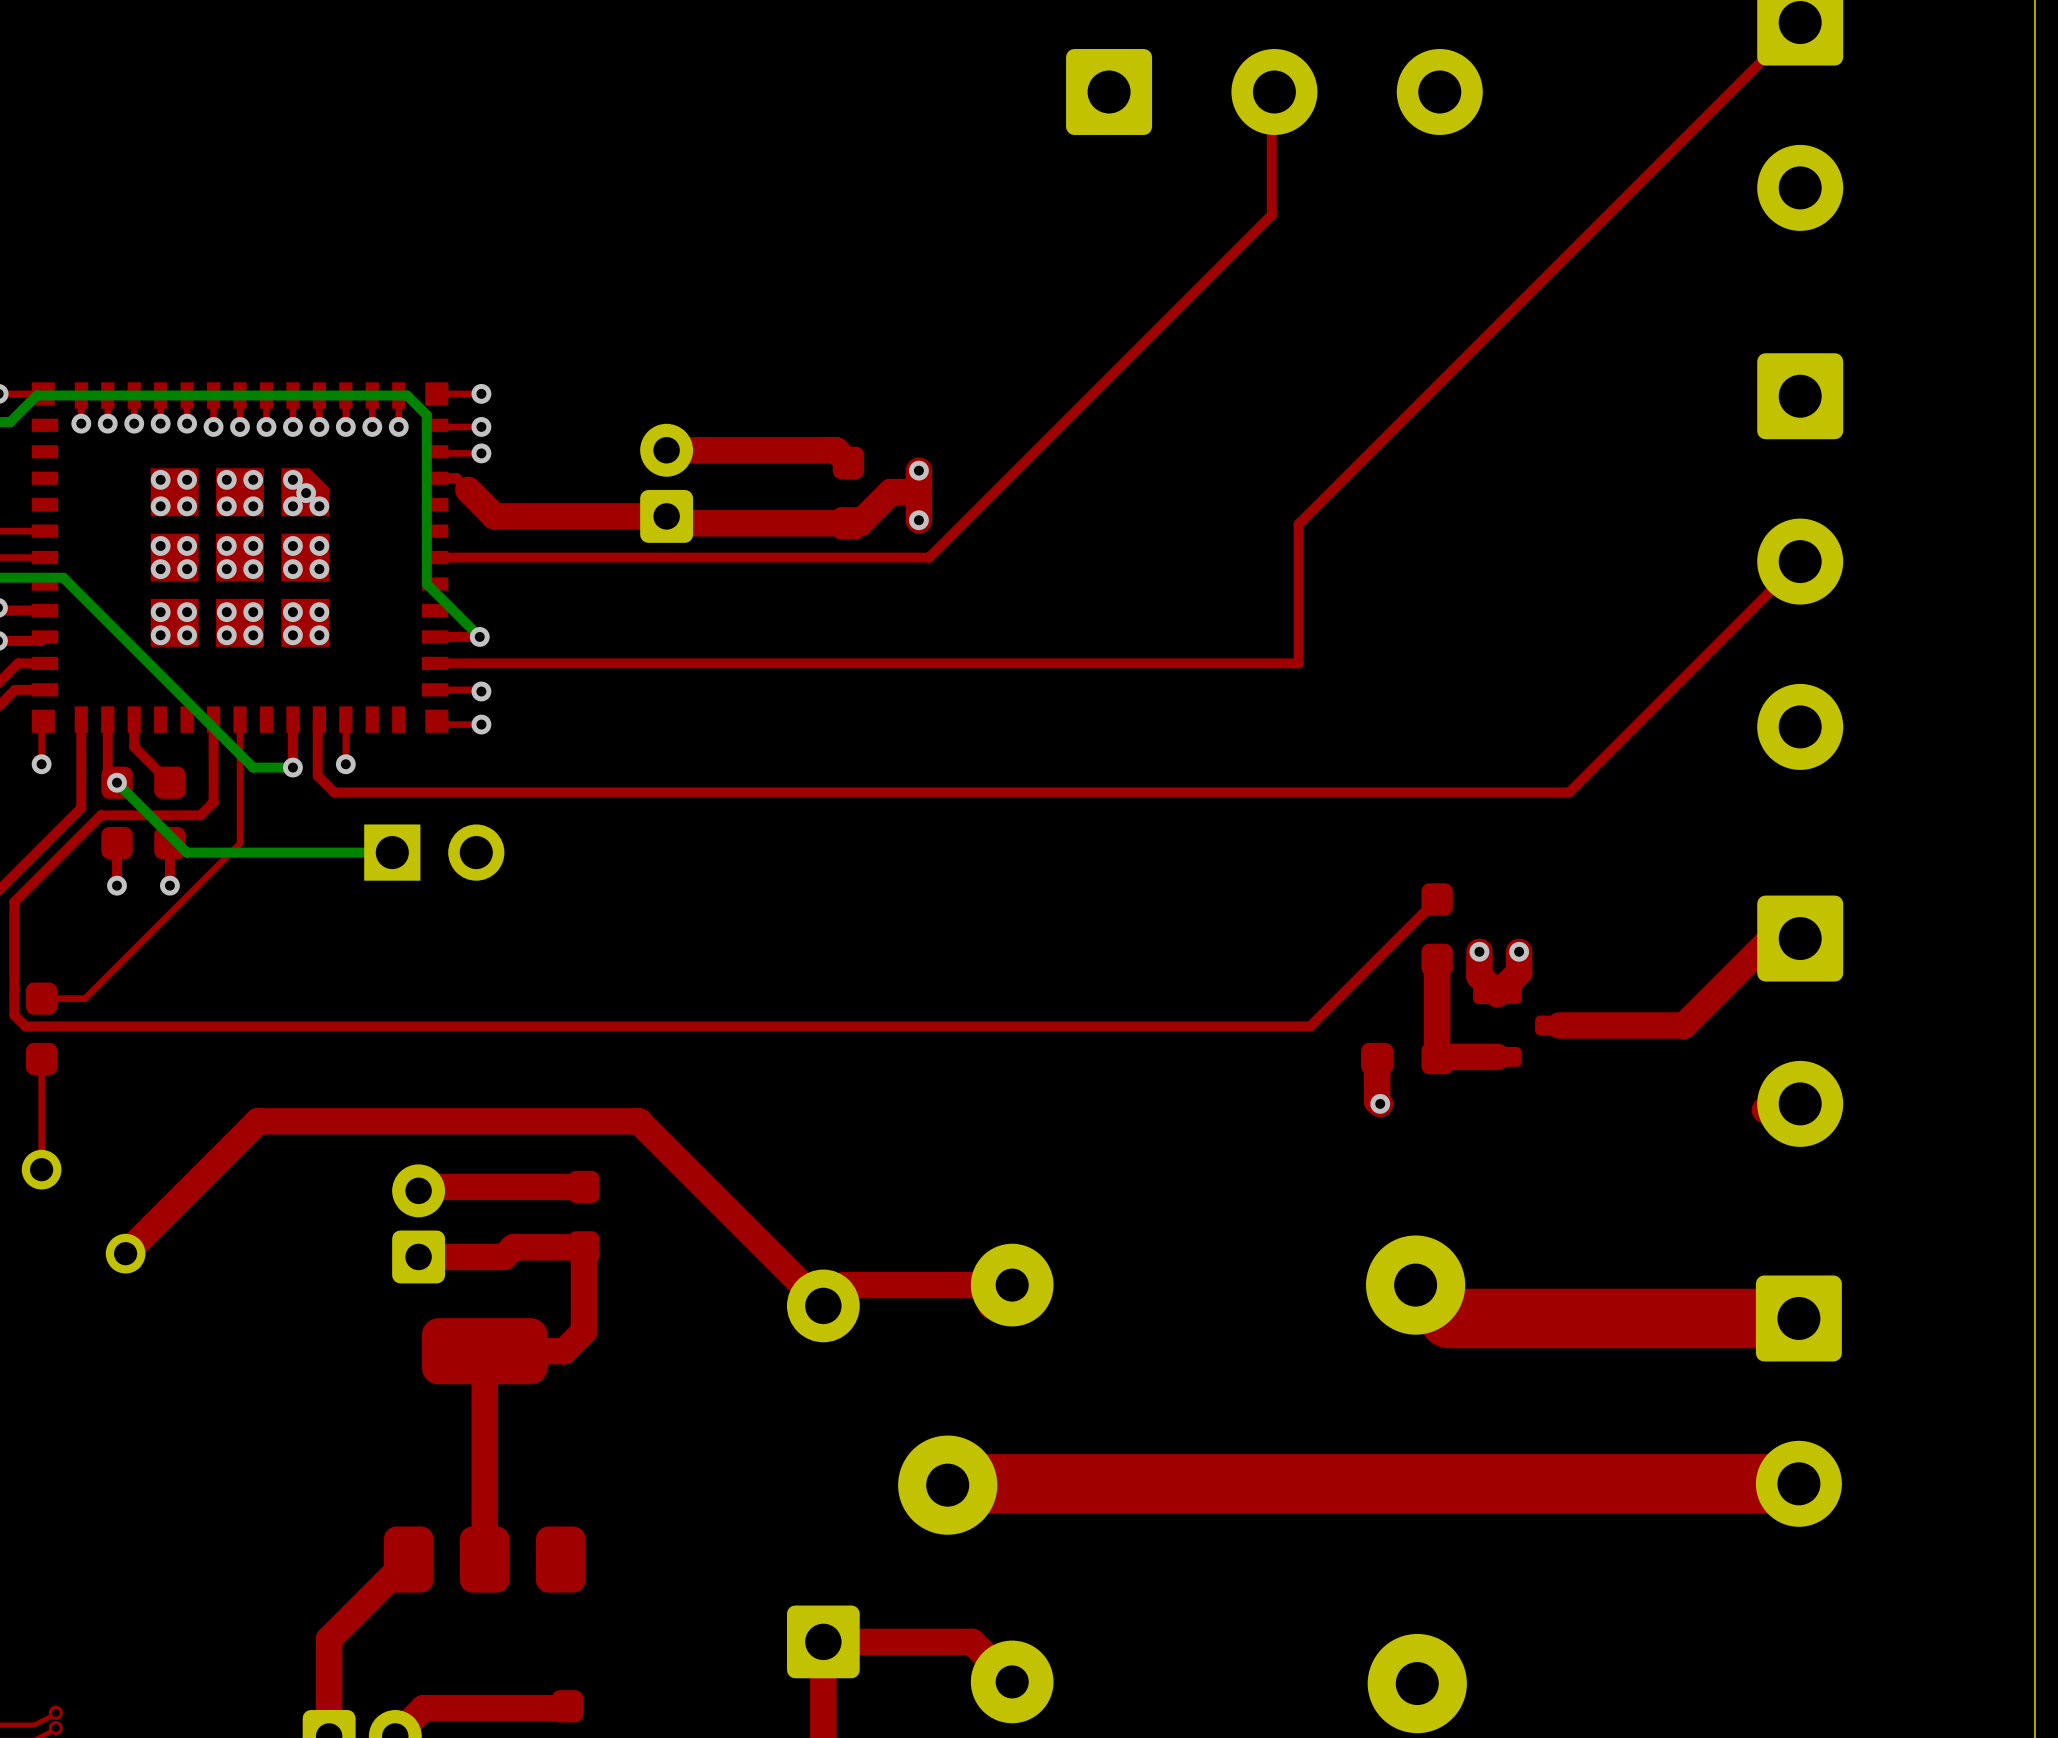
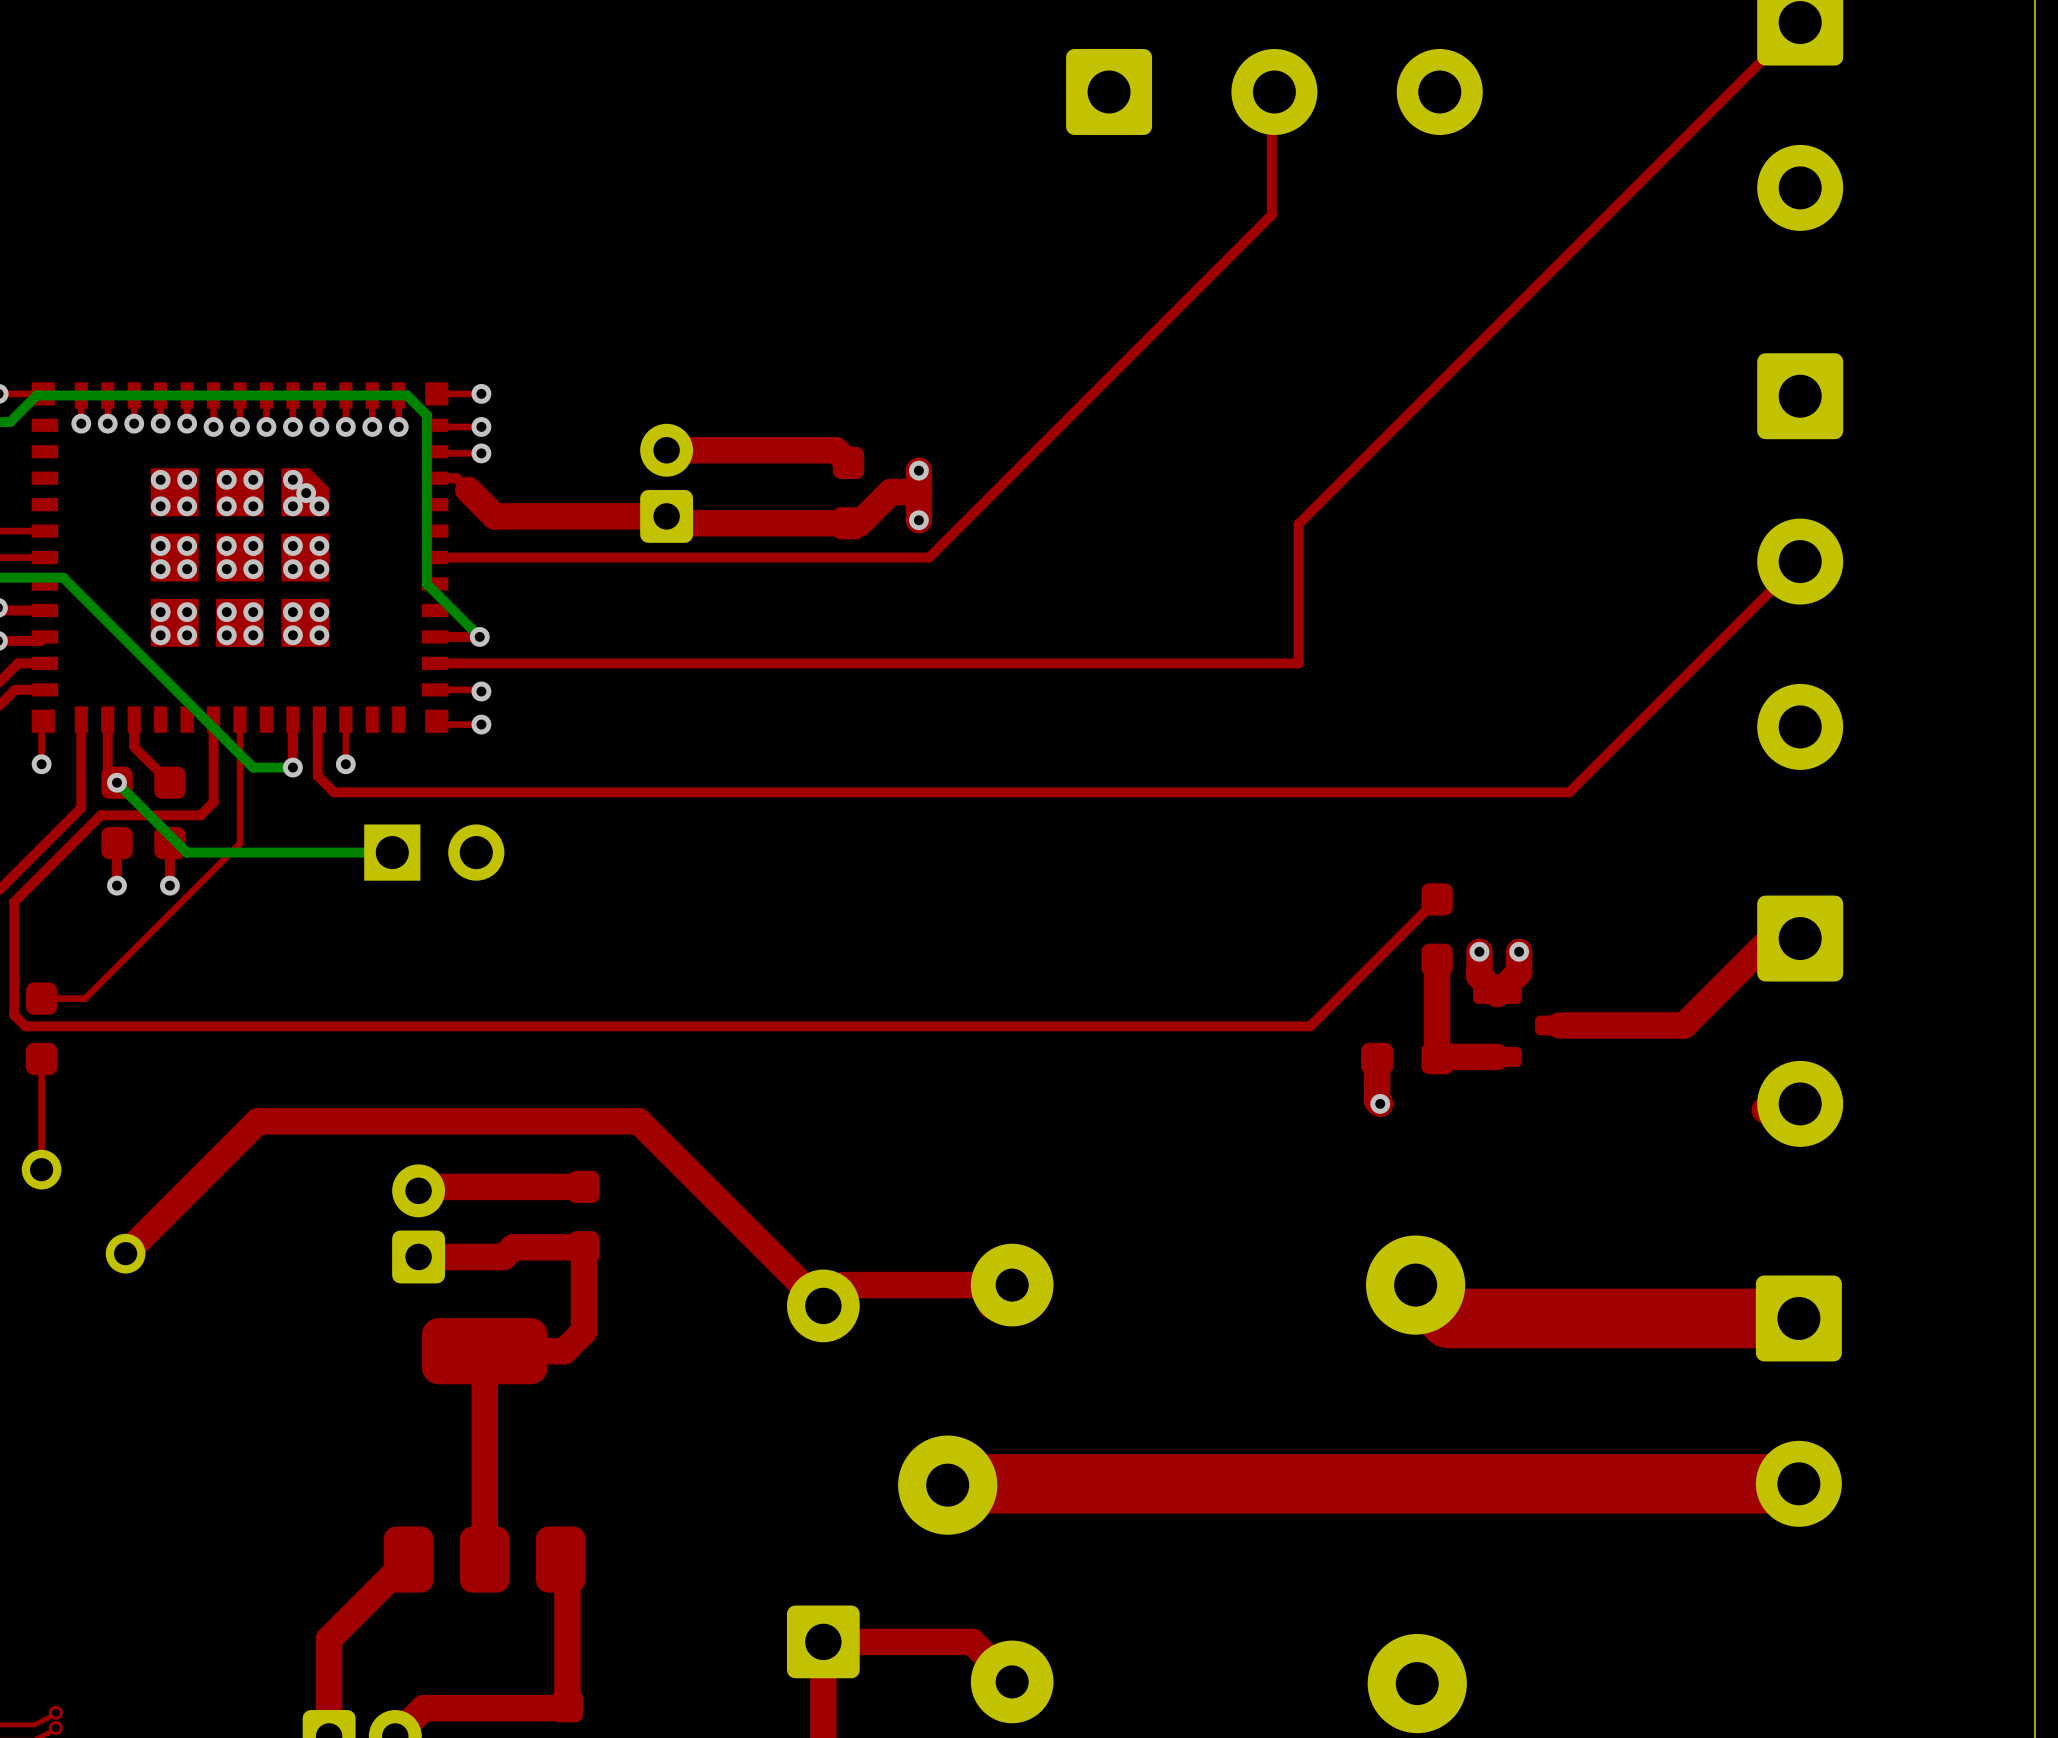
top track: none -> (567, 1566) (567, 1706)

